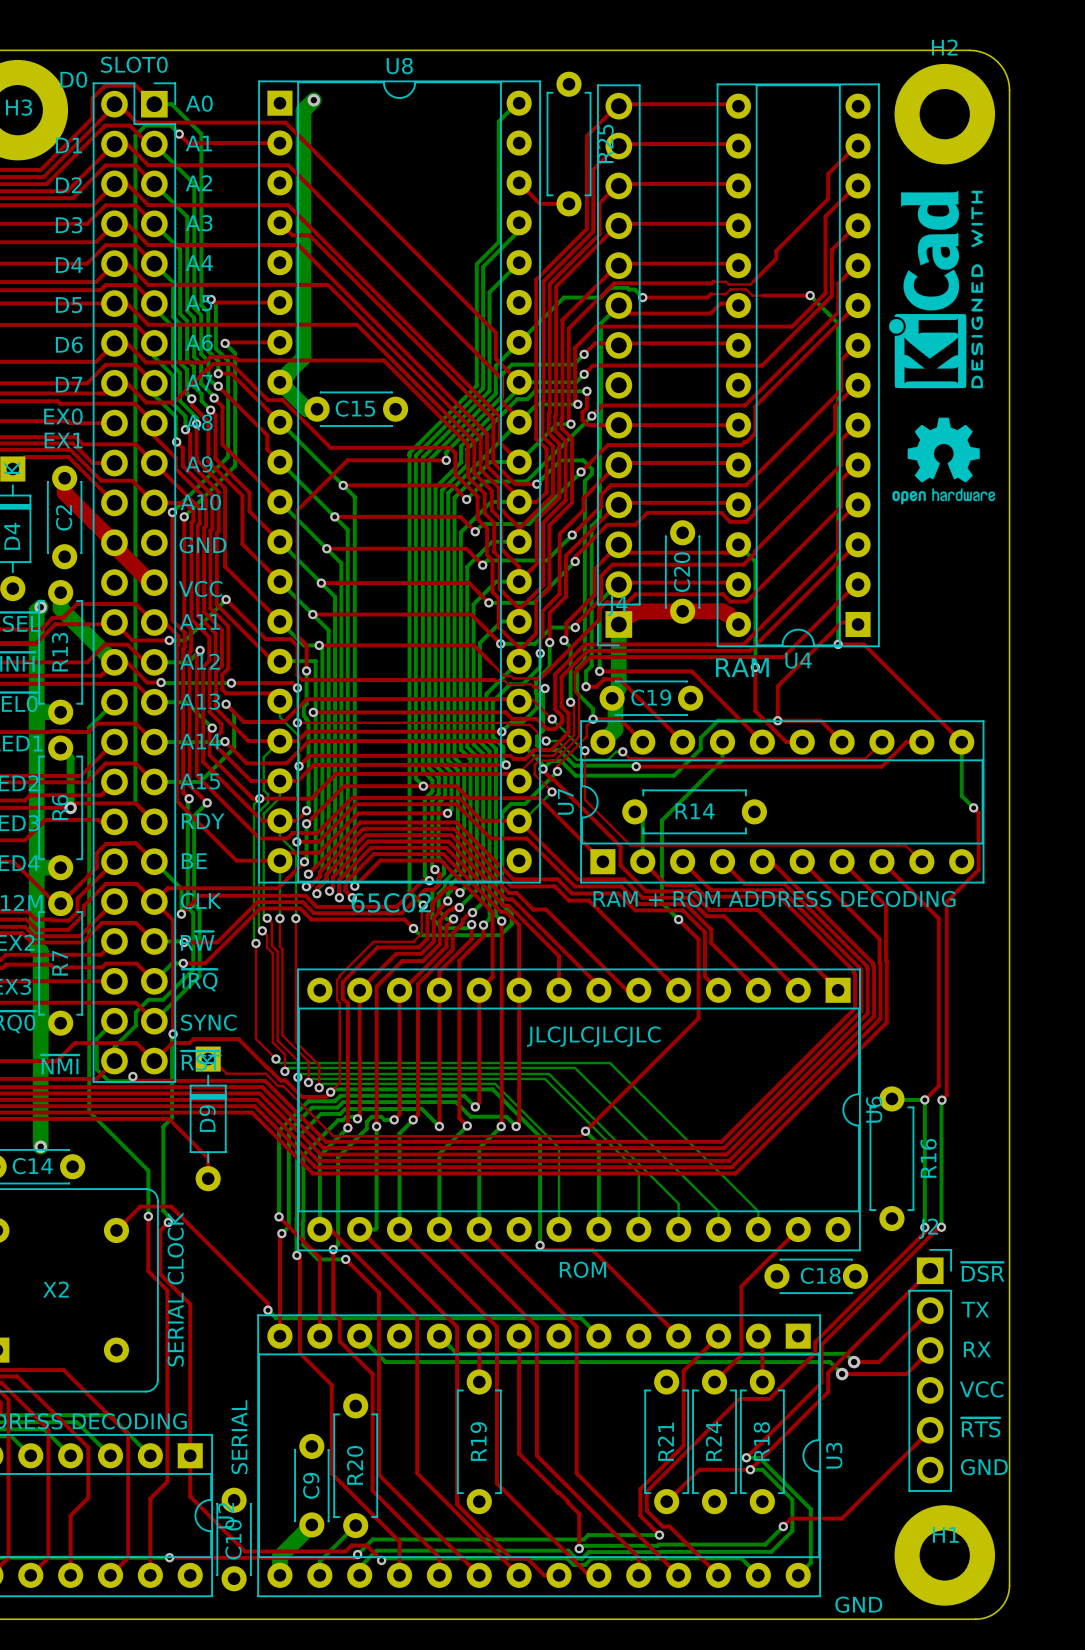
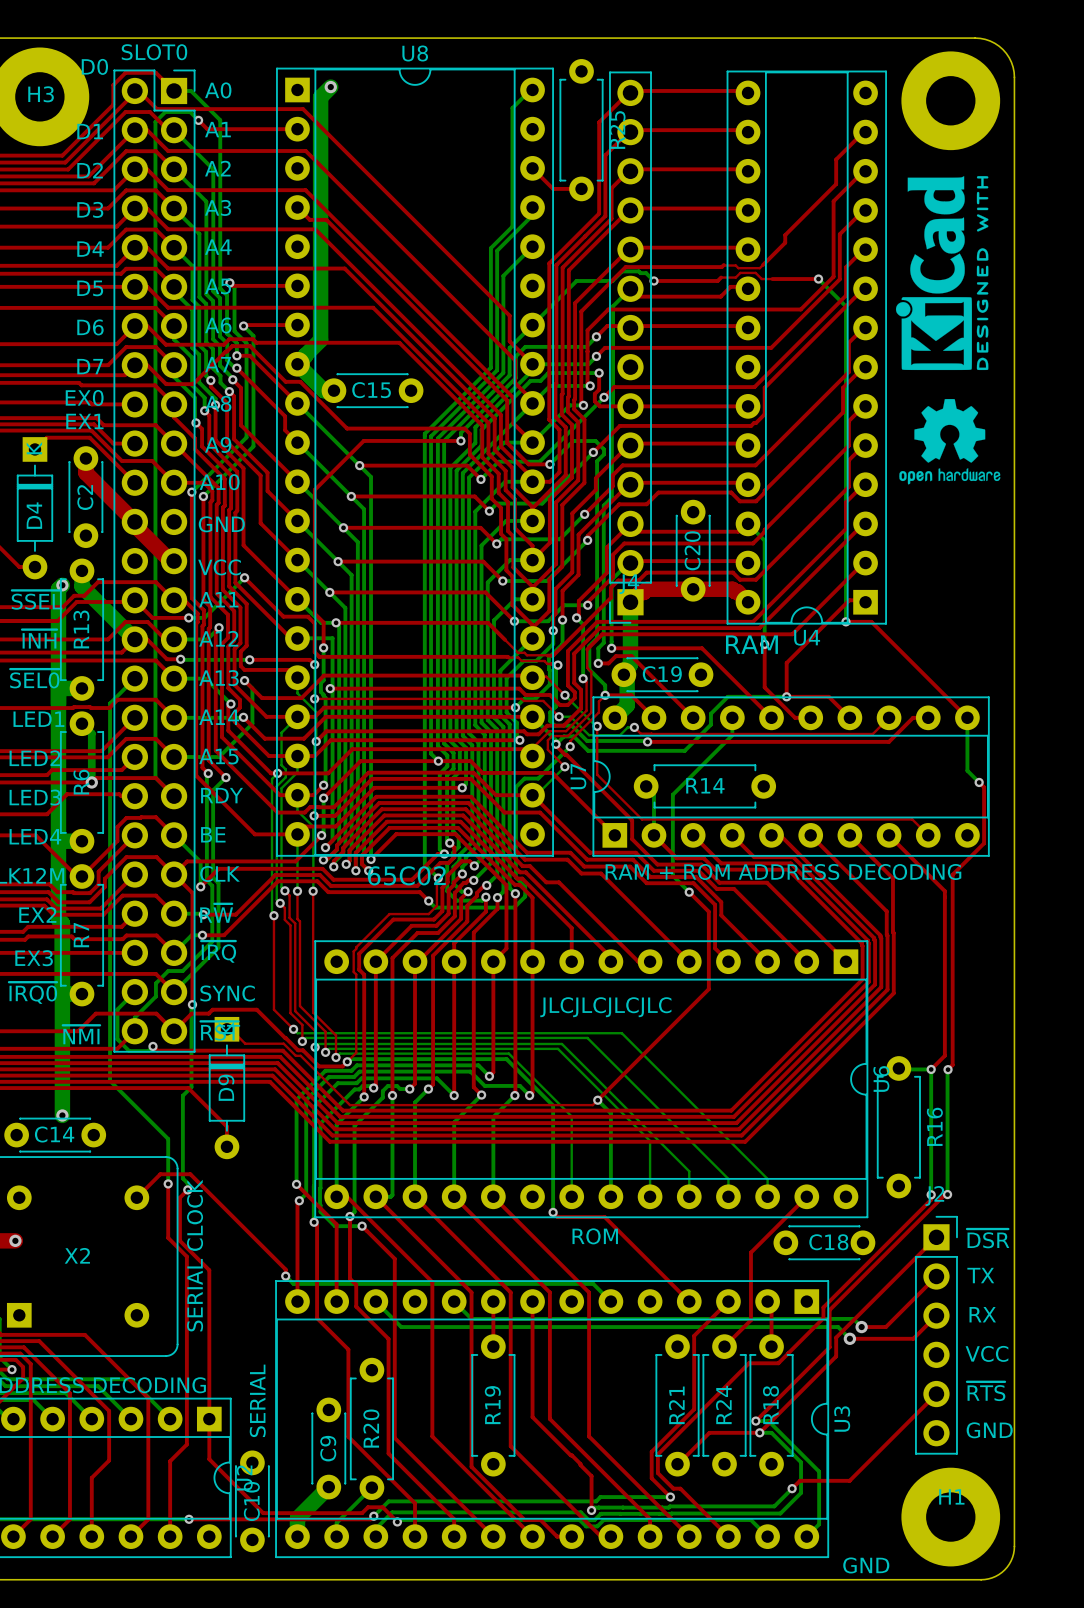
H2 name: H2 (944, 47) -> none

